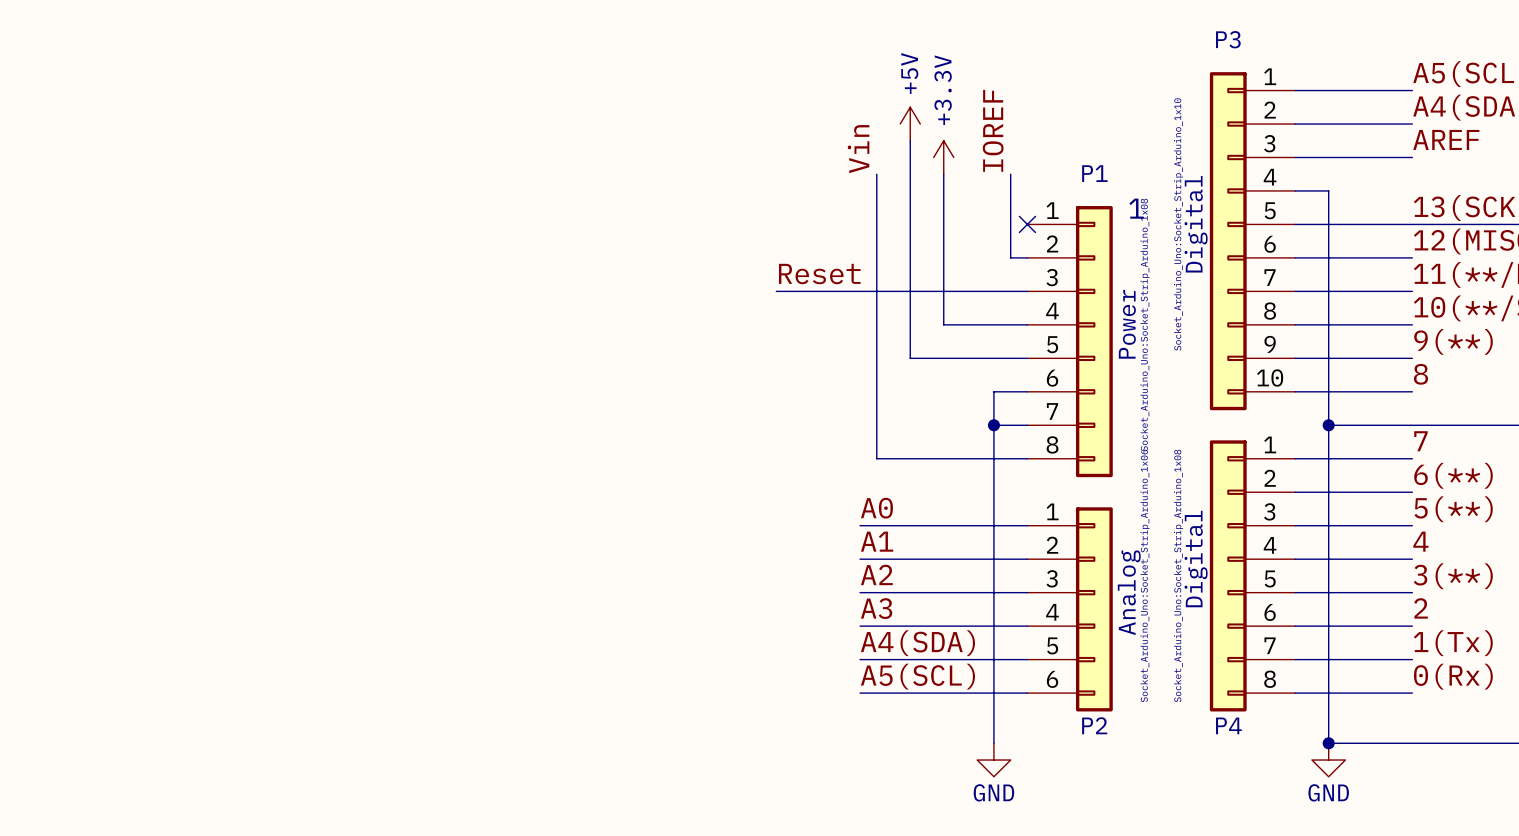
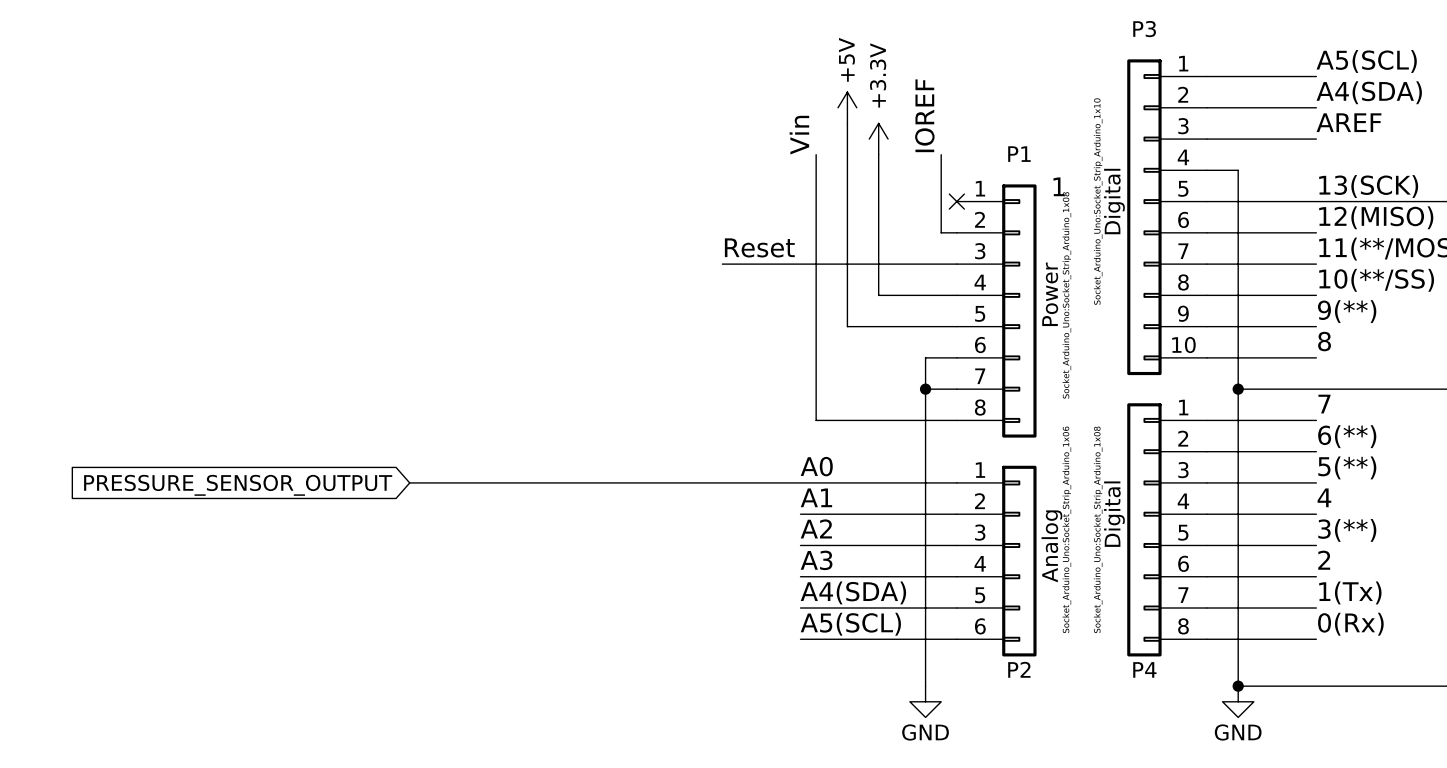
wire: none -> (409, 482) (800, 482)
global label: none -> PRESSURE_SENSOR_OUTPUT (238, 485)

